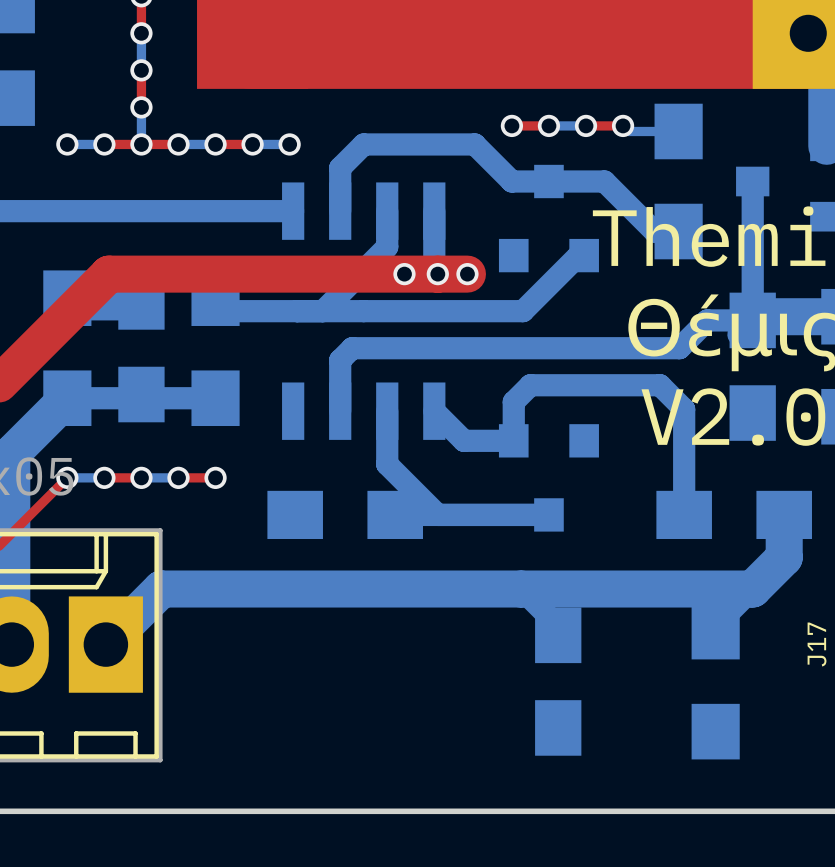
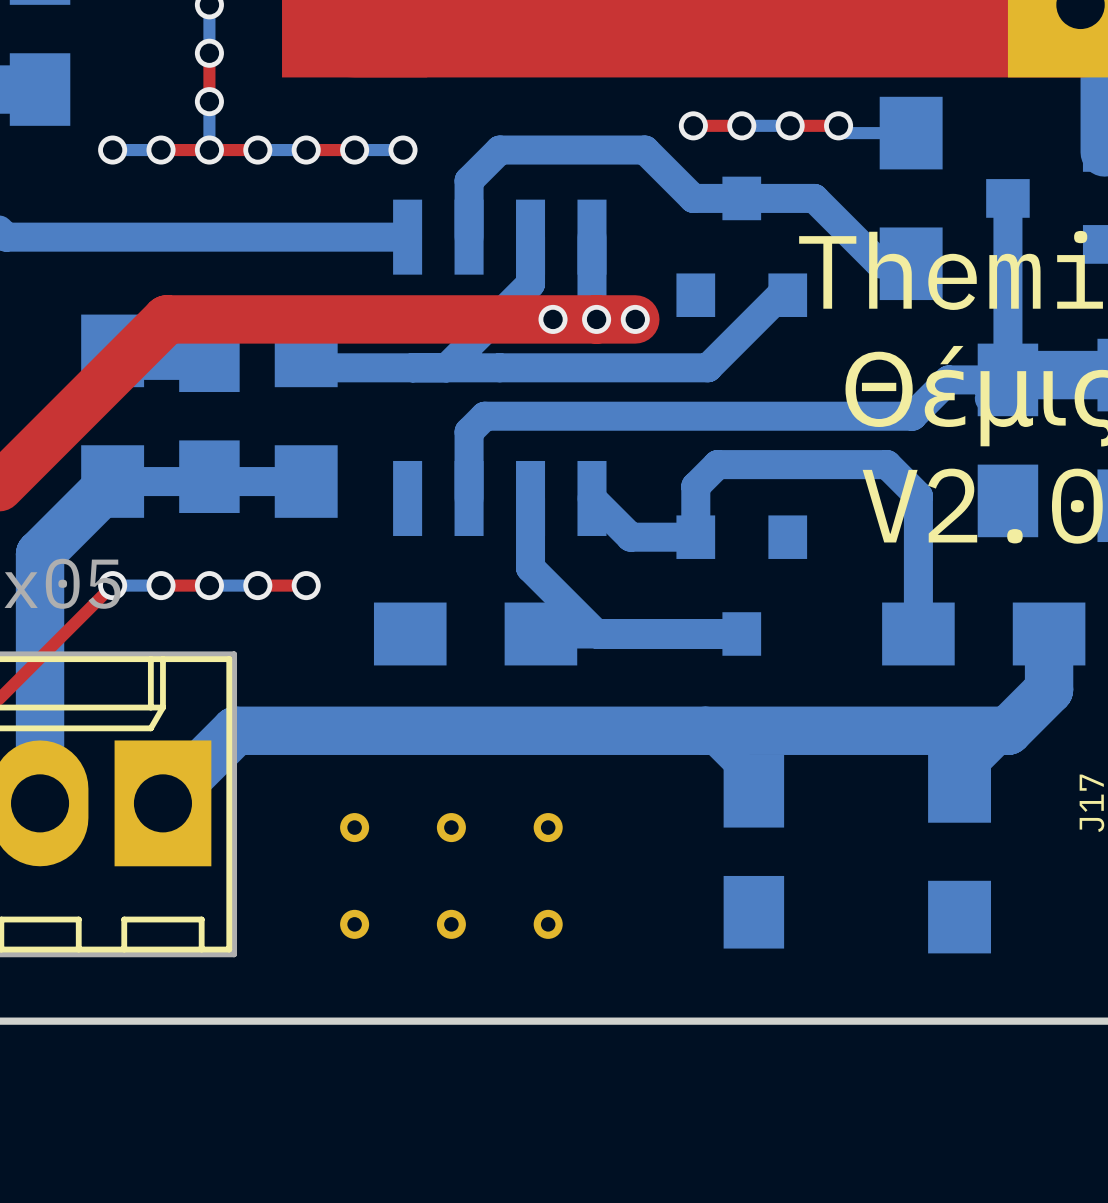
part: none -> (354, 827)
part: none -> (451, 827)
part: none -> (548, 827)
part: none -> (354, 924)
part: none -> (451, 924)
part: none -> (548, 924)

